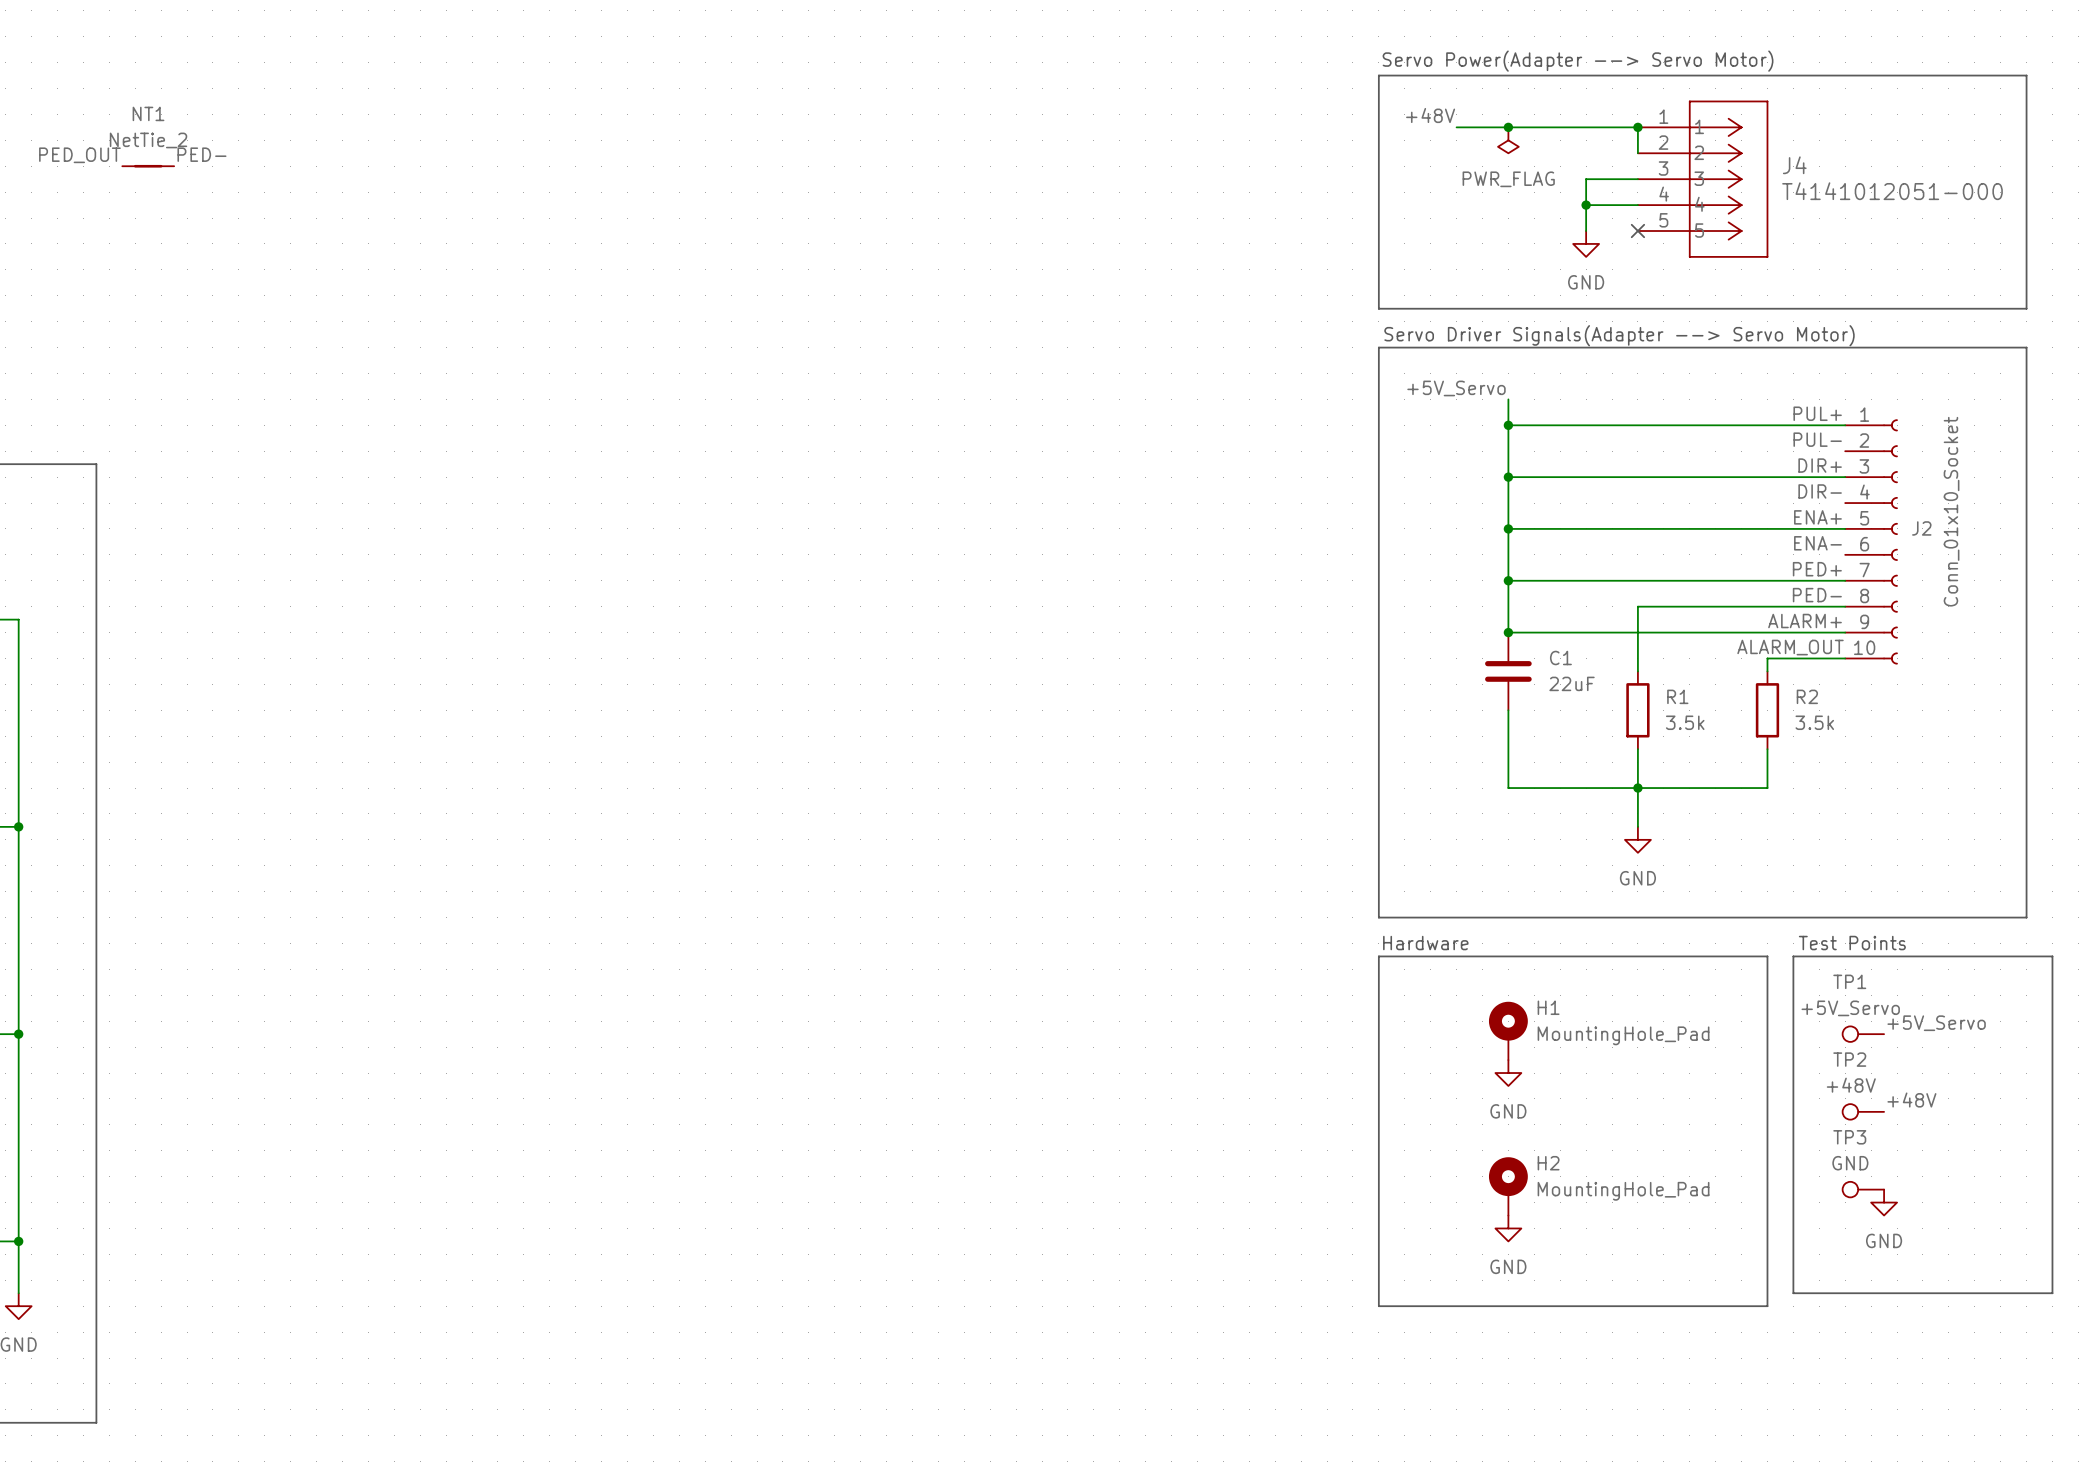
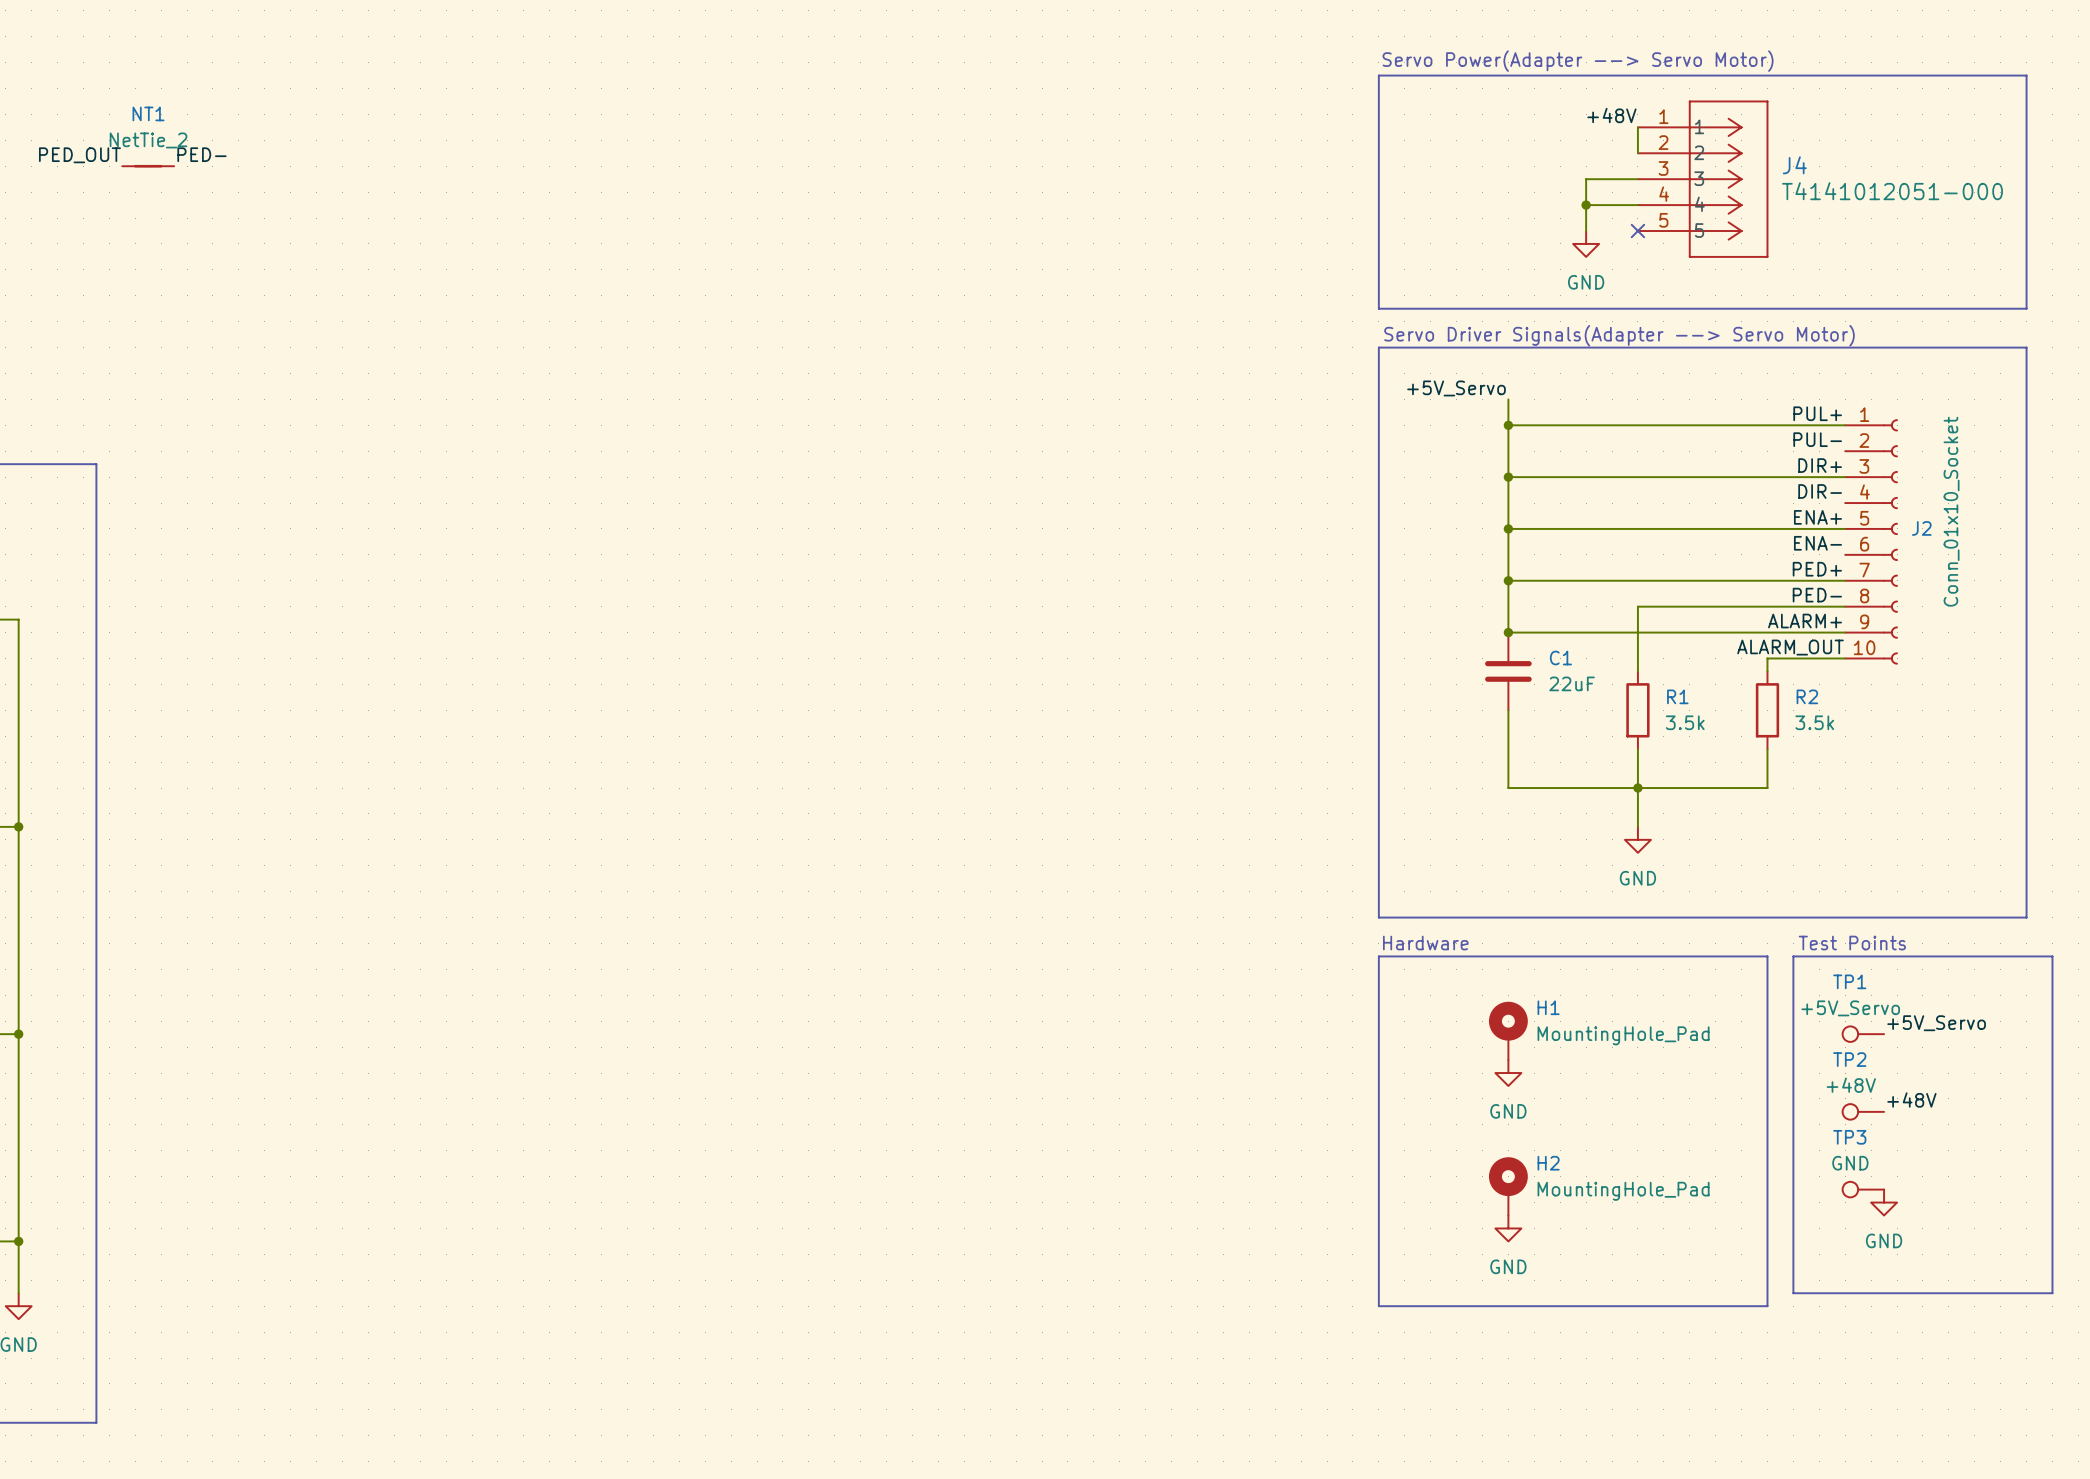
label position: +48V (1430, 115) -> +48V (1611, 115)
wire: (1456, 127) (1637, 127) -> none
junction: (1508, 127) -> none
junction: (1637, 127) -> none
power symbol: PWR_FLAG (1508, 140) -> none

